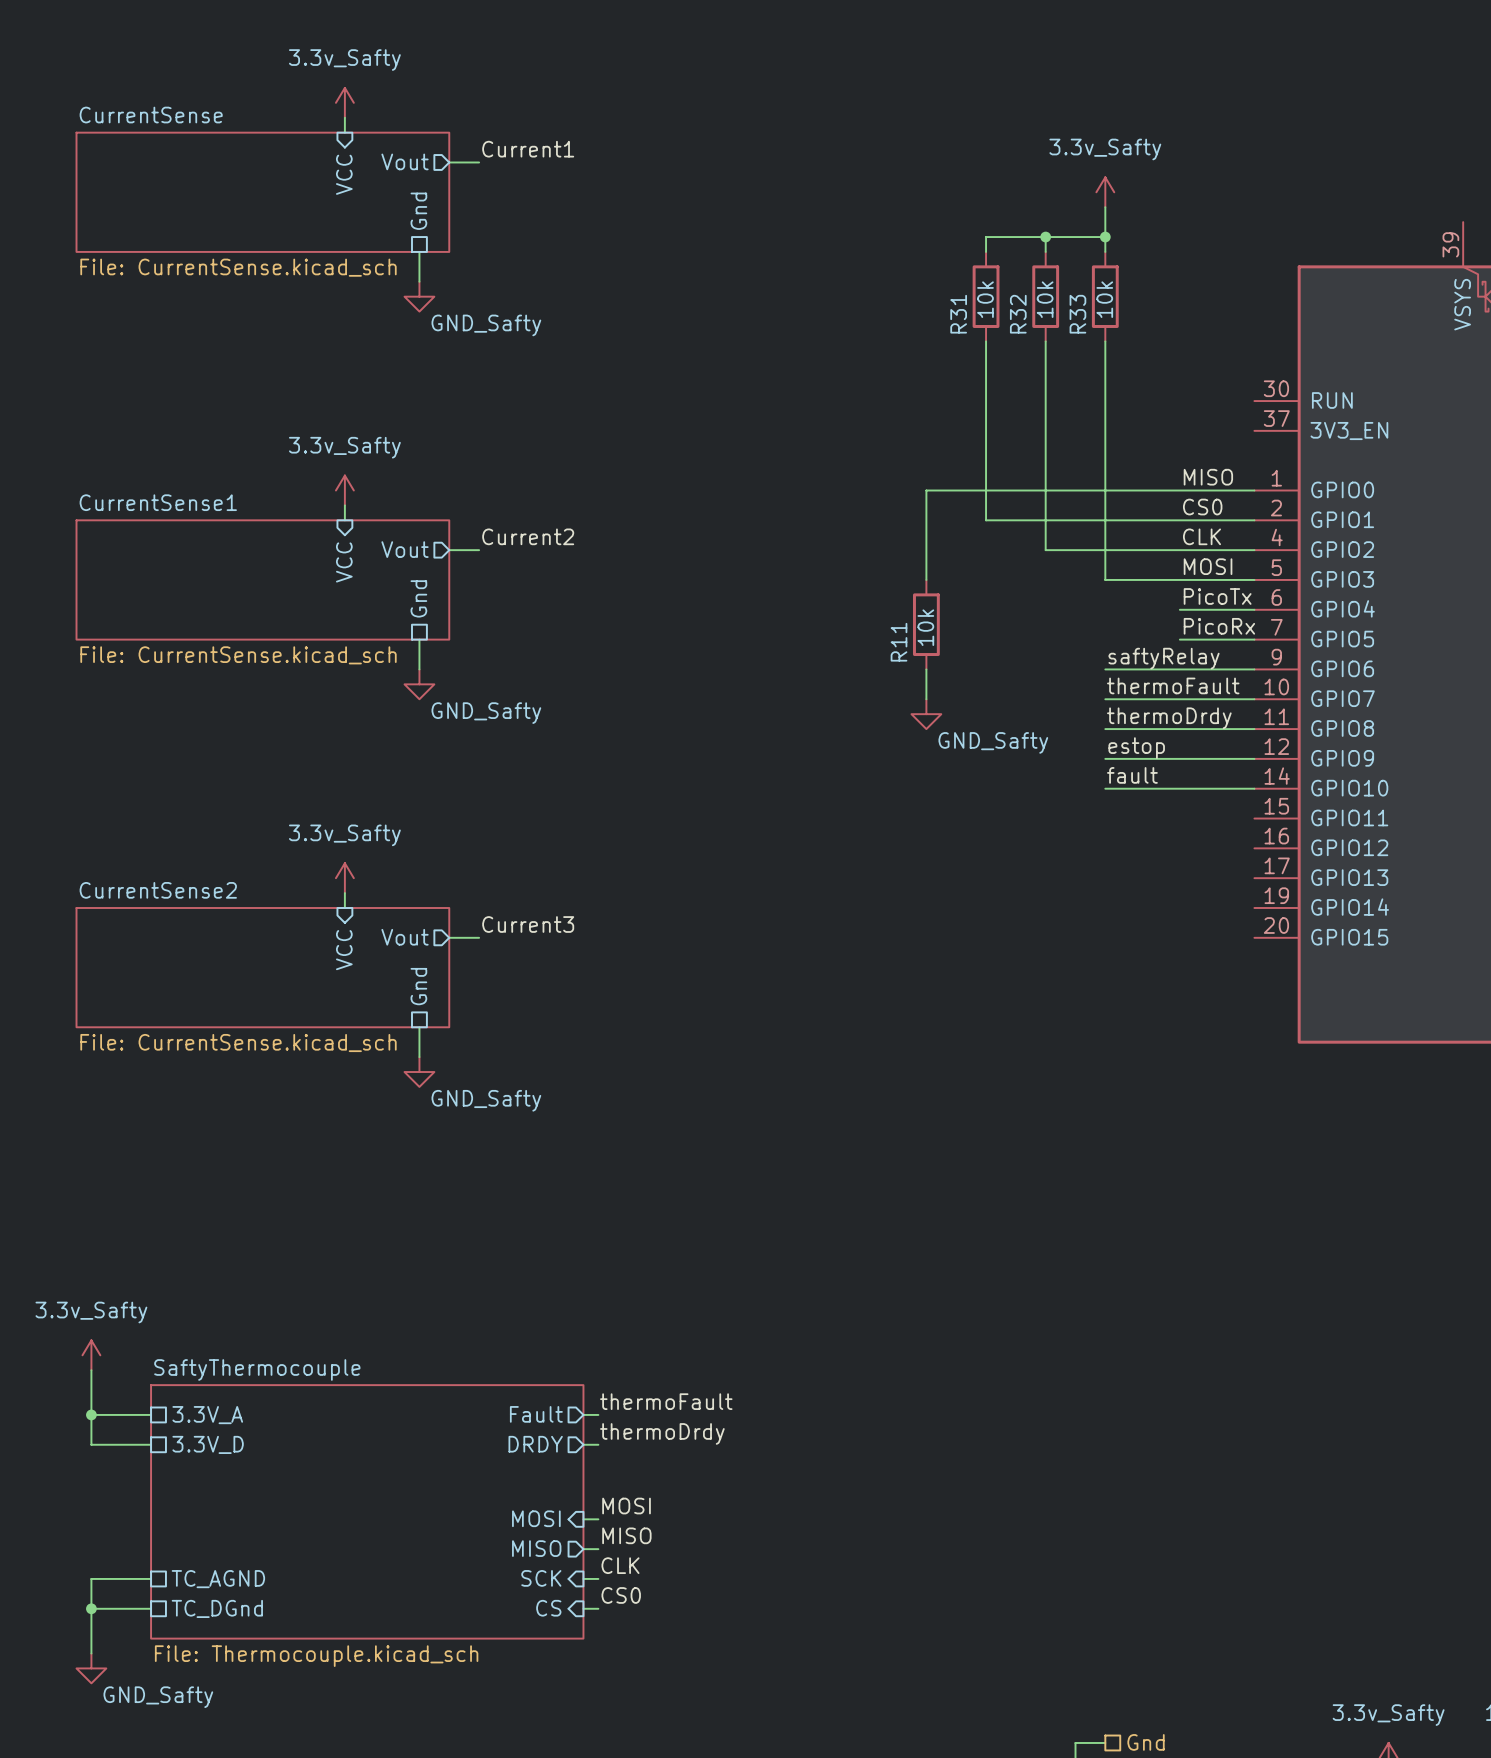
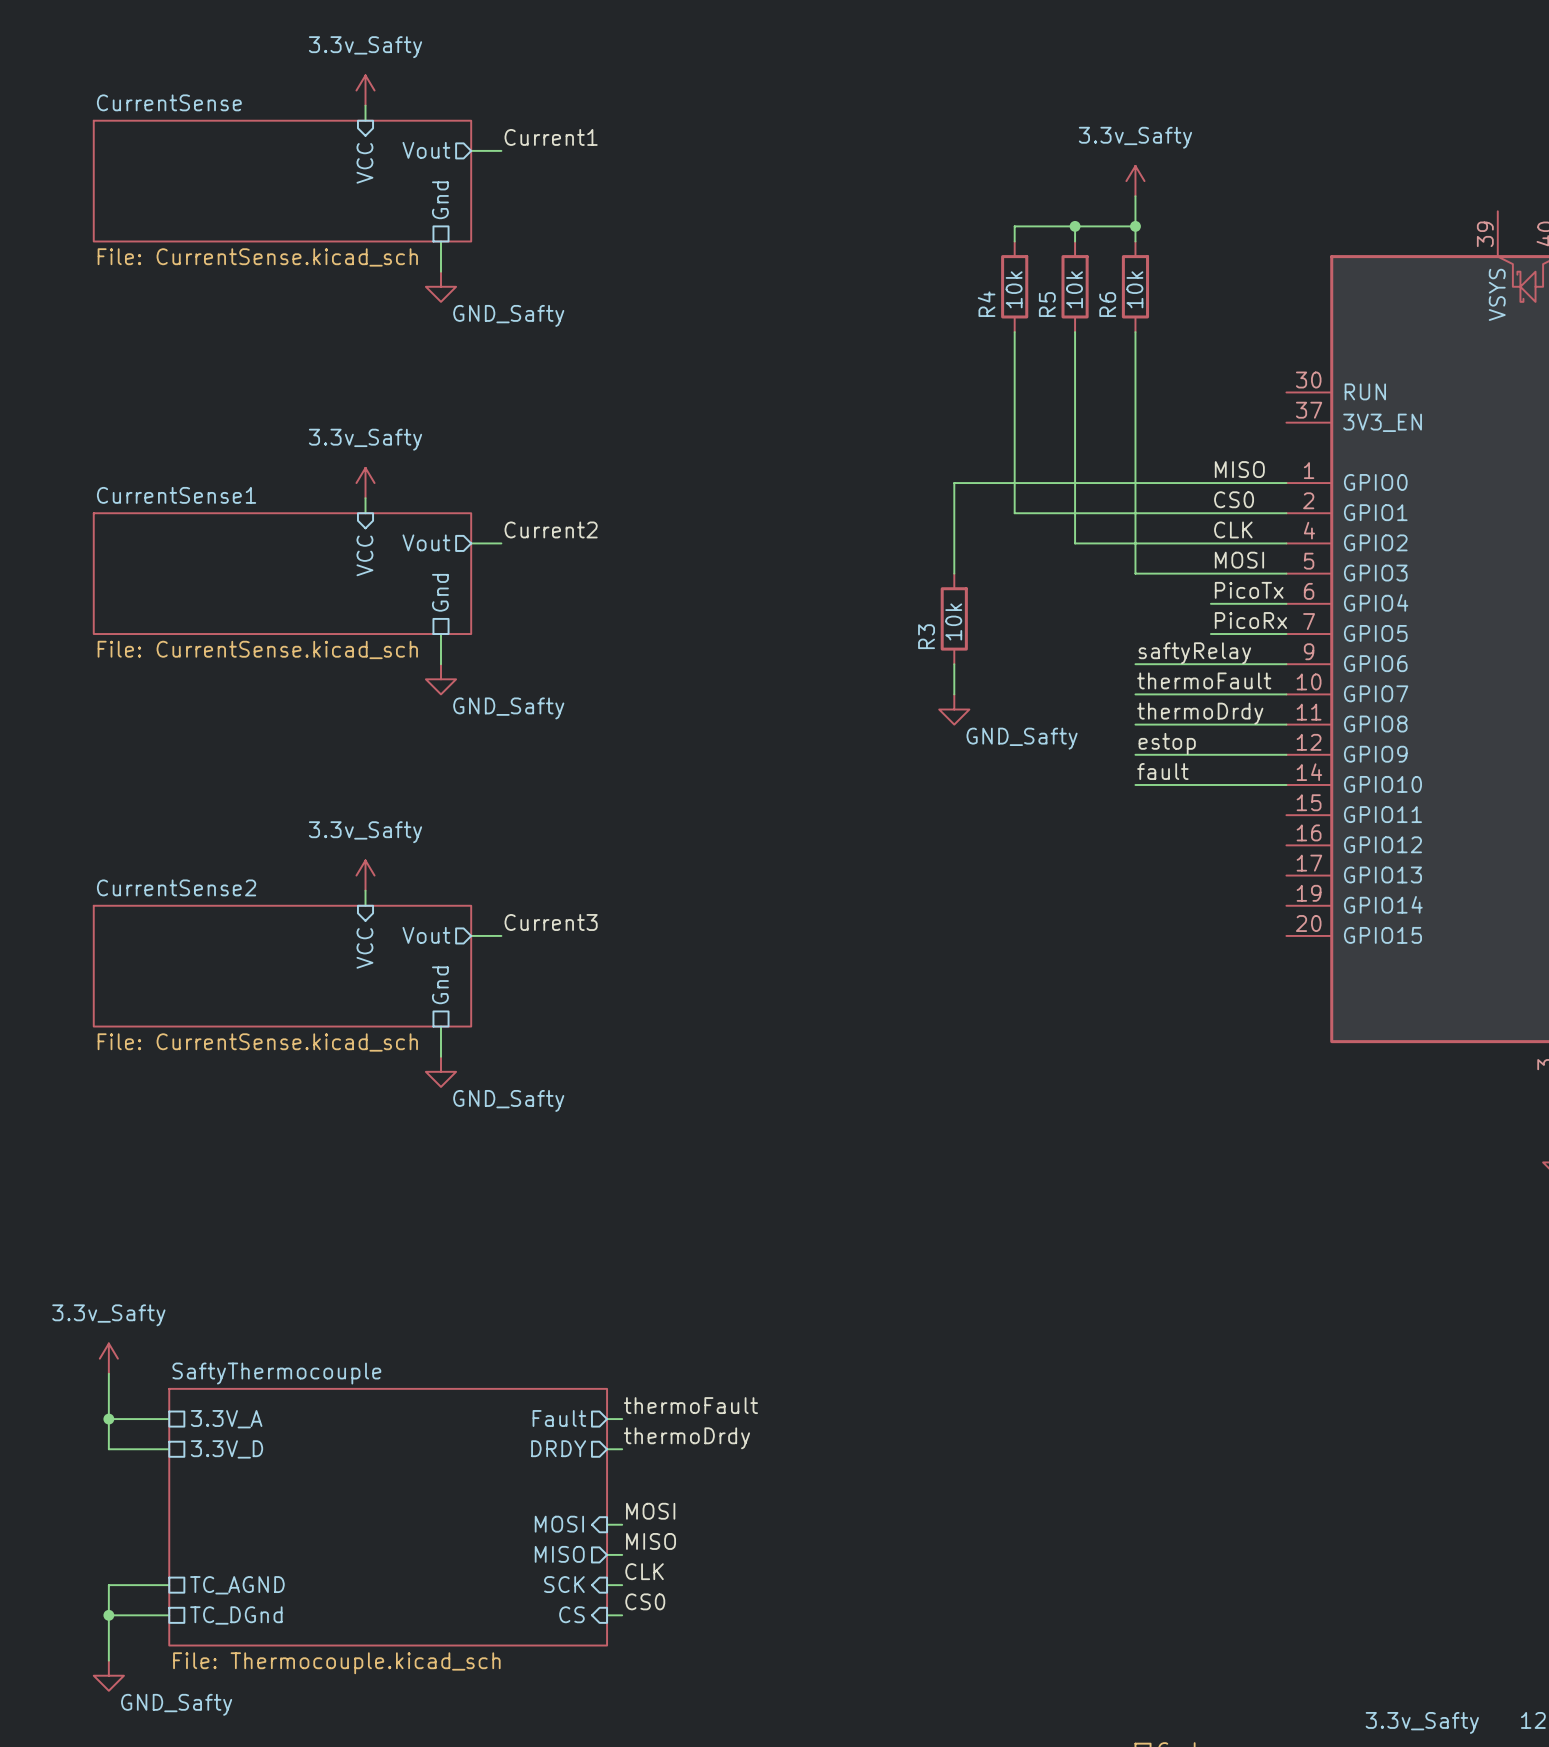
R31 name: R31 (958, 314) -> R4 (986, 304)
R32 name: R32 (1018, 314) -> R5 (1047, 304)
R33 name: R33 (1077, 314) -> R6 (1107, 304)
R11 name: R11 (899, 642) -> R3 (926, 636)

